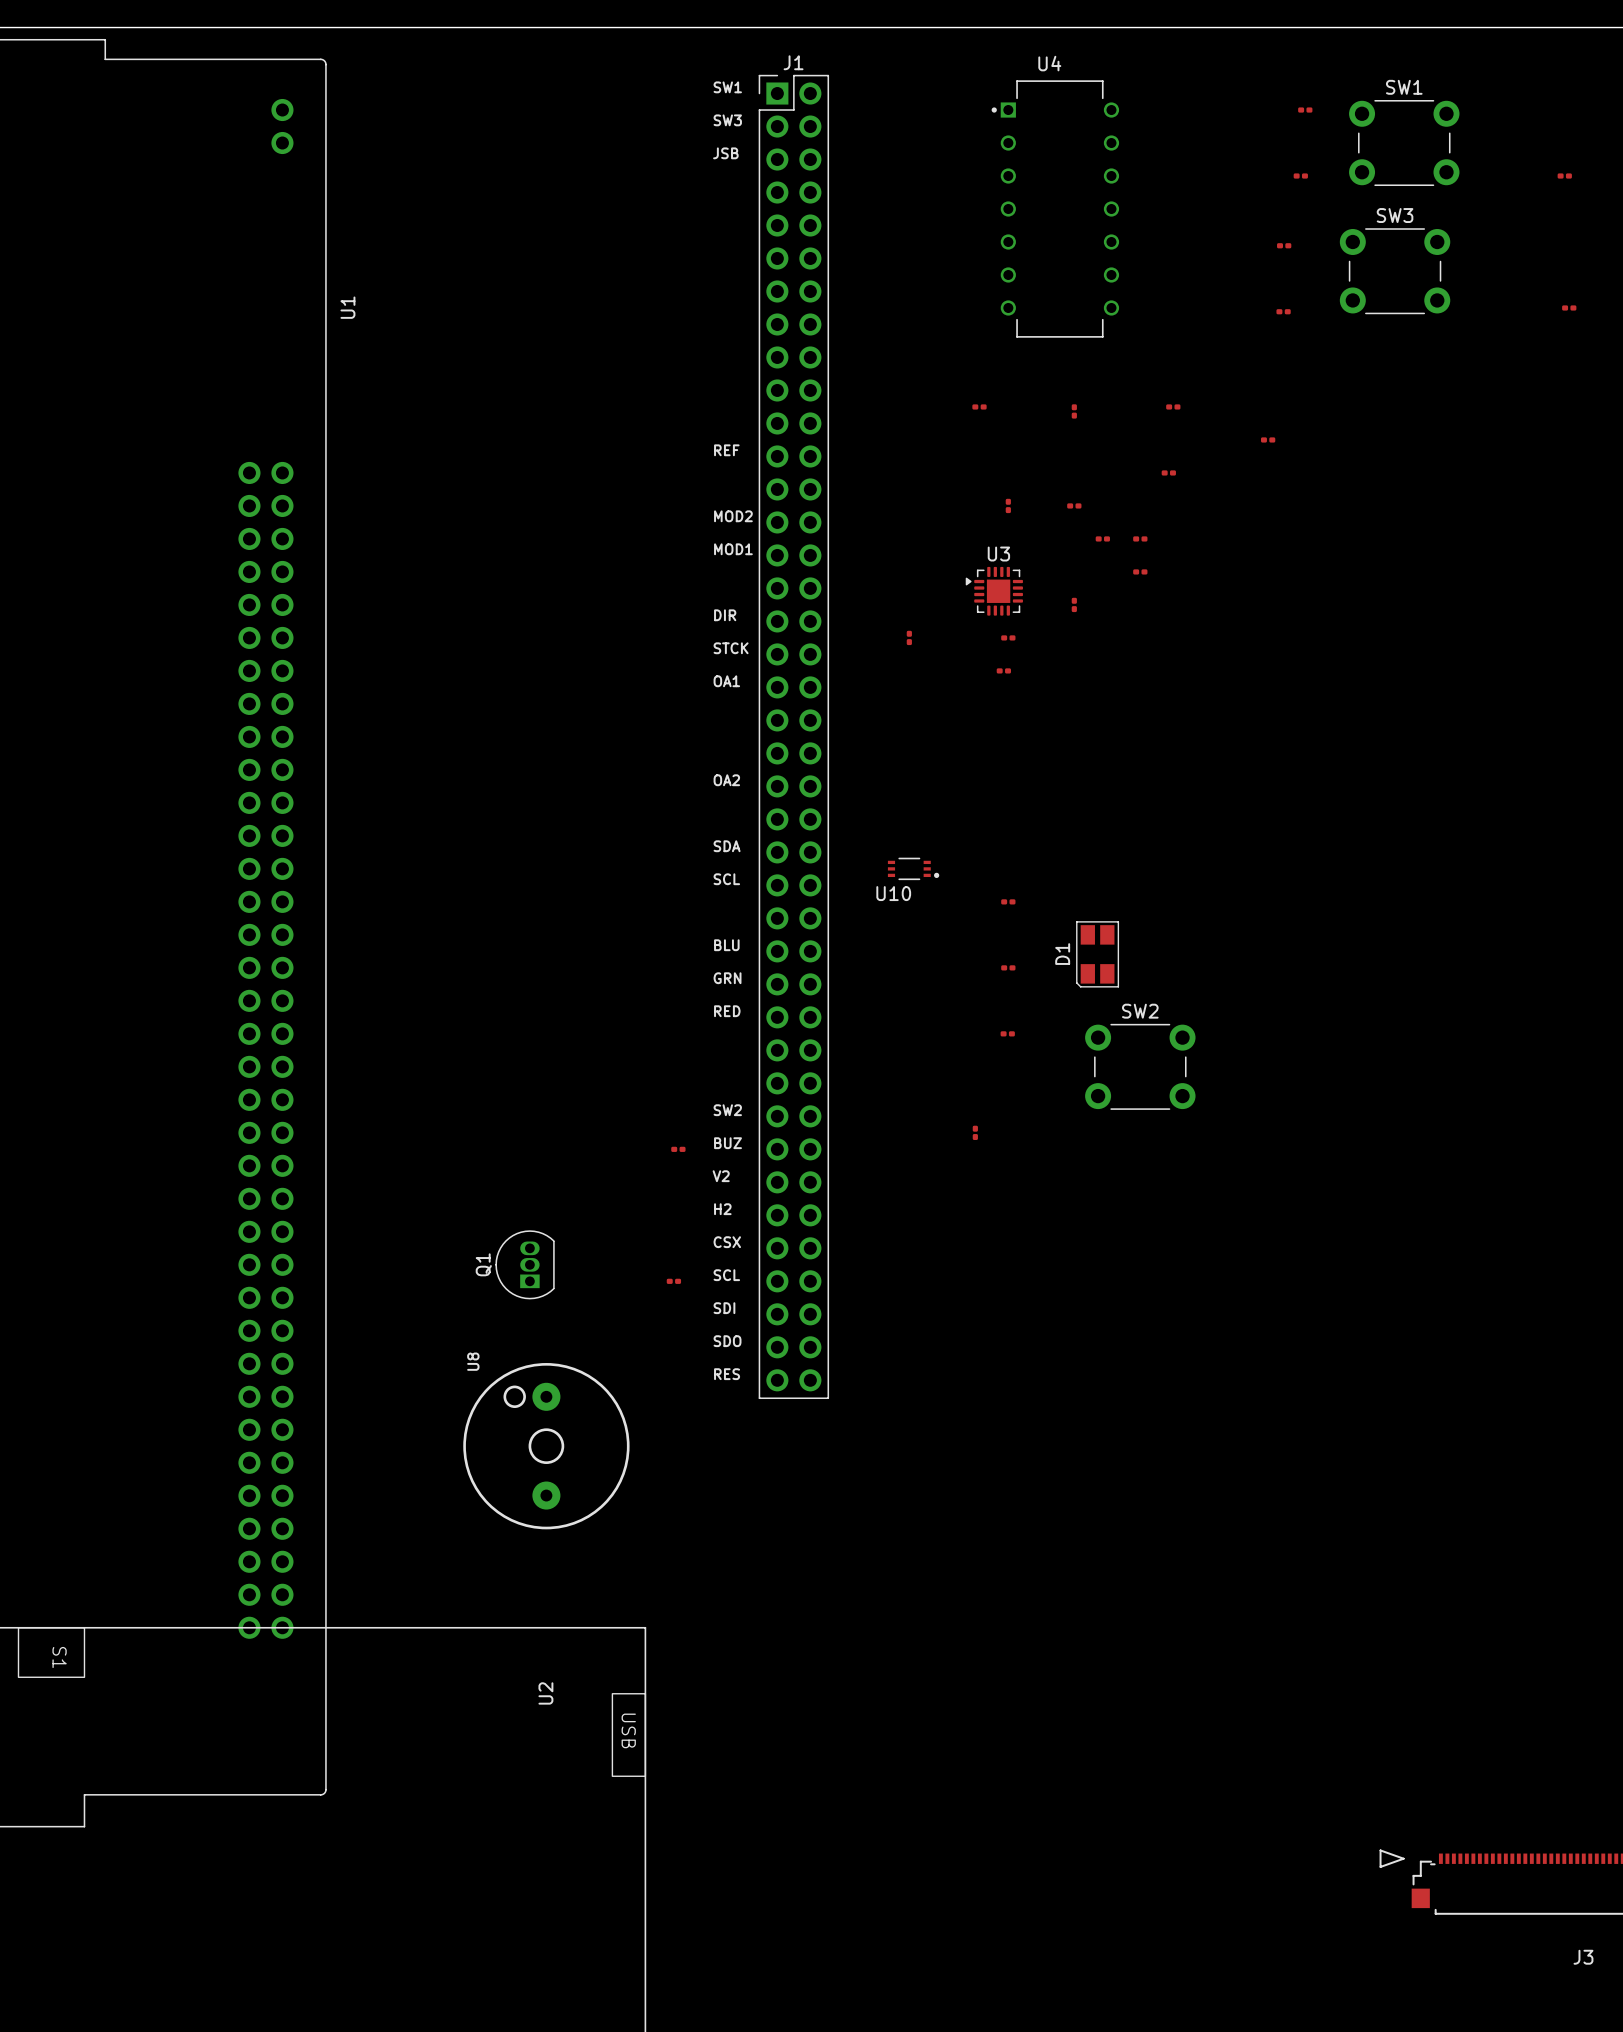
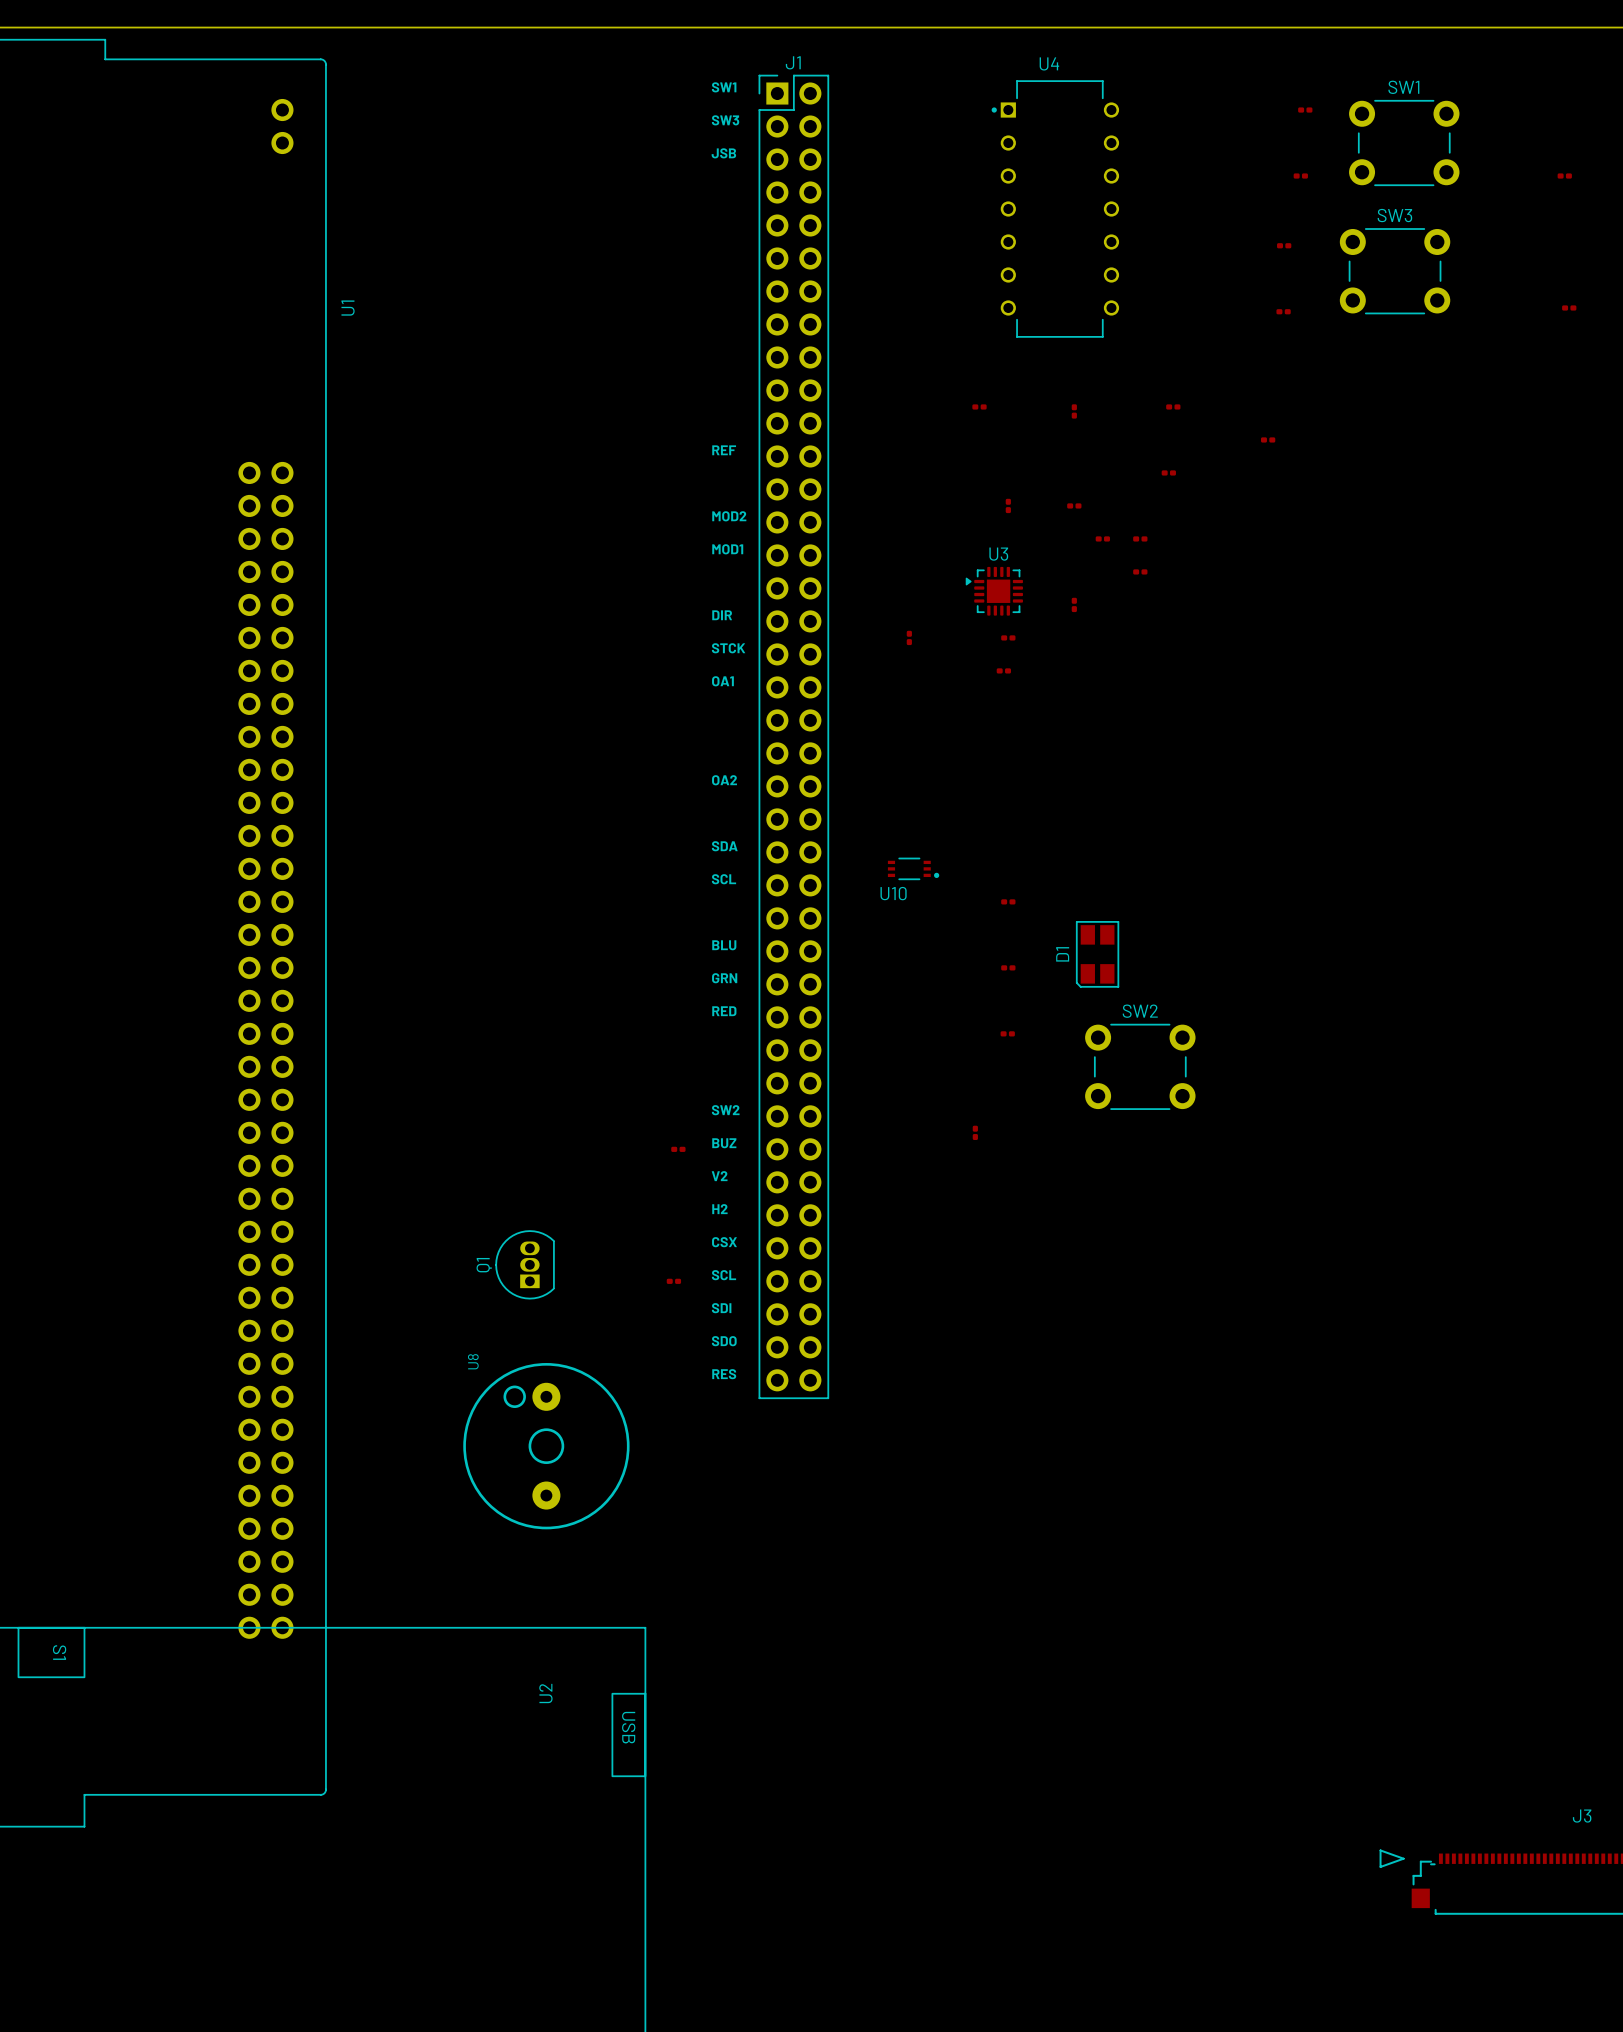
J3 name position: J3 (1583, 1957) -> J3 (1582, 1816)

